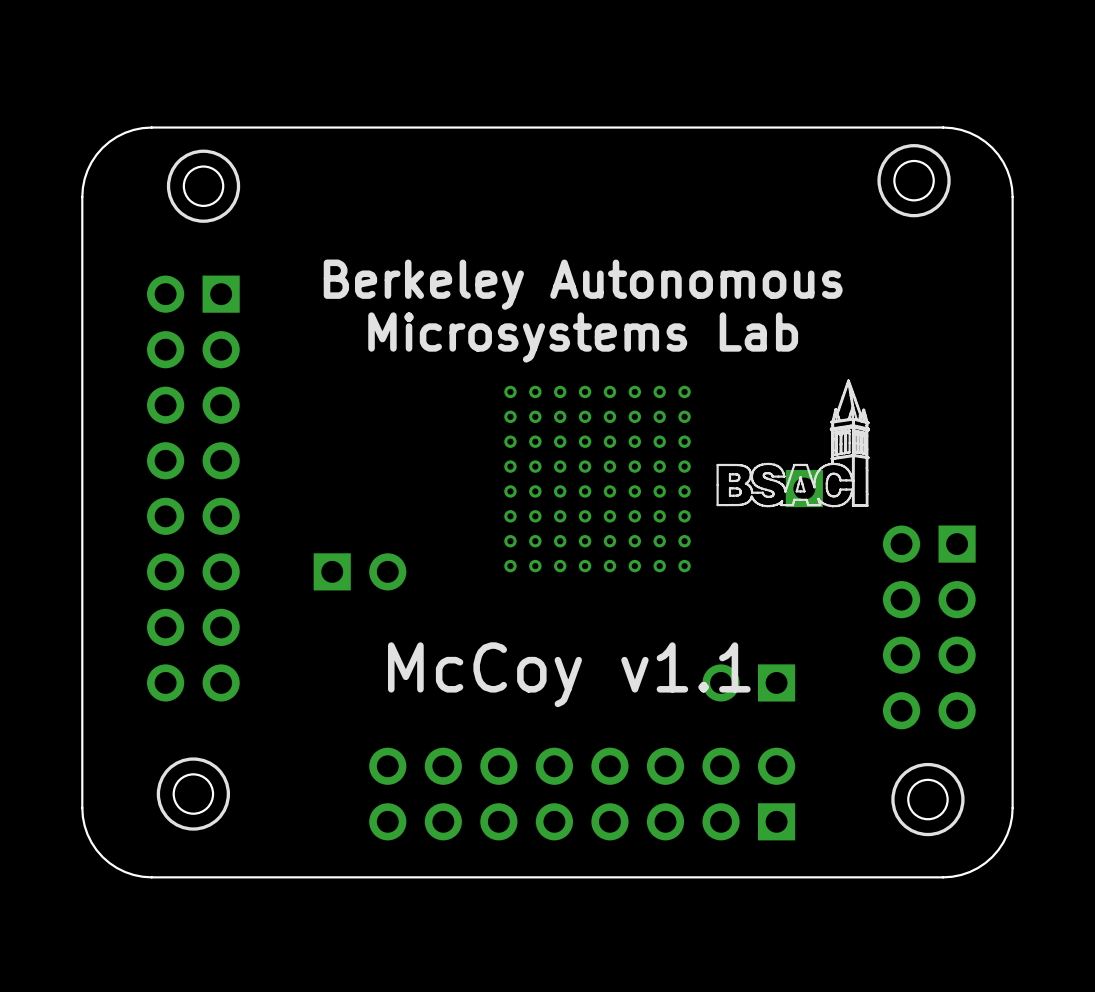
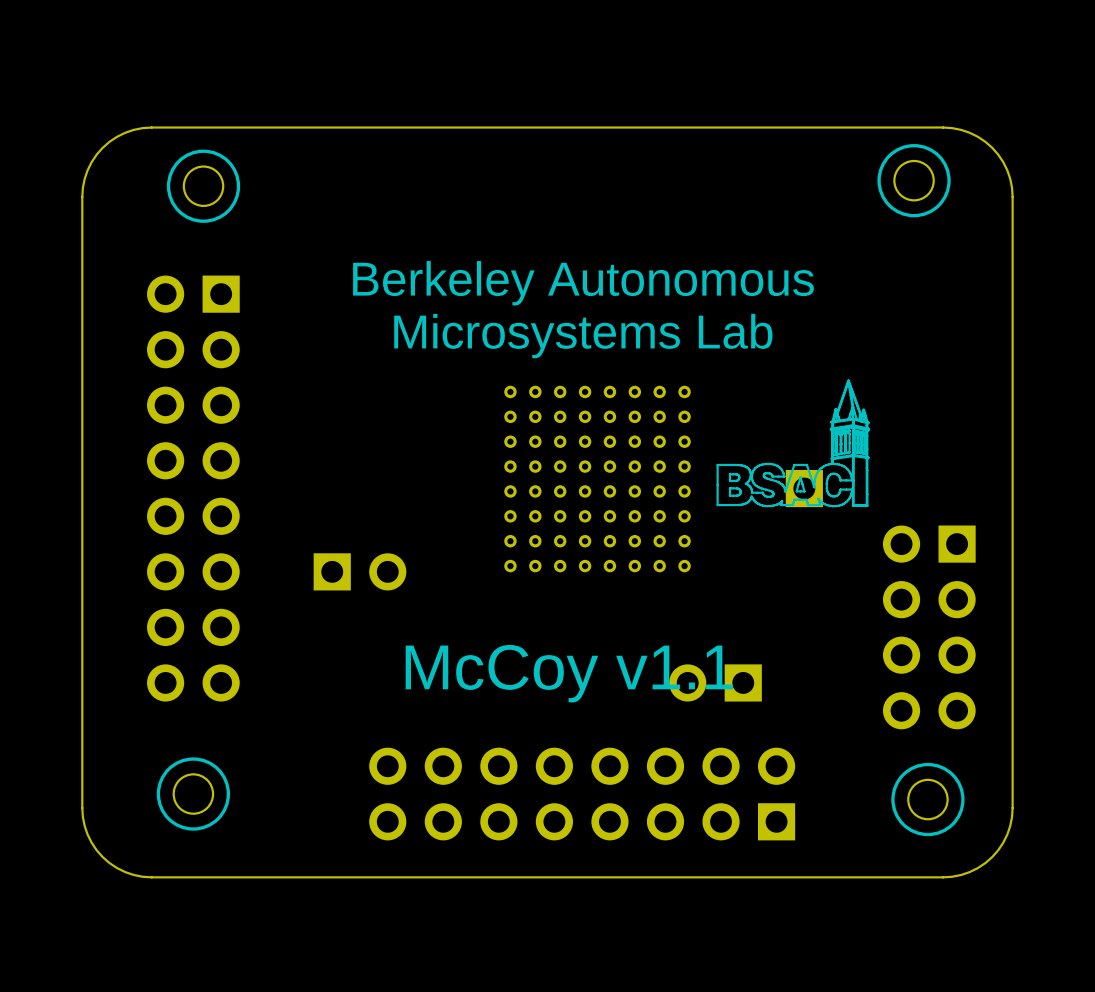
part position: (748, 682) -> (715, 682)

